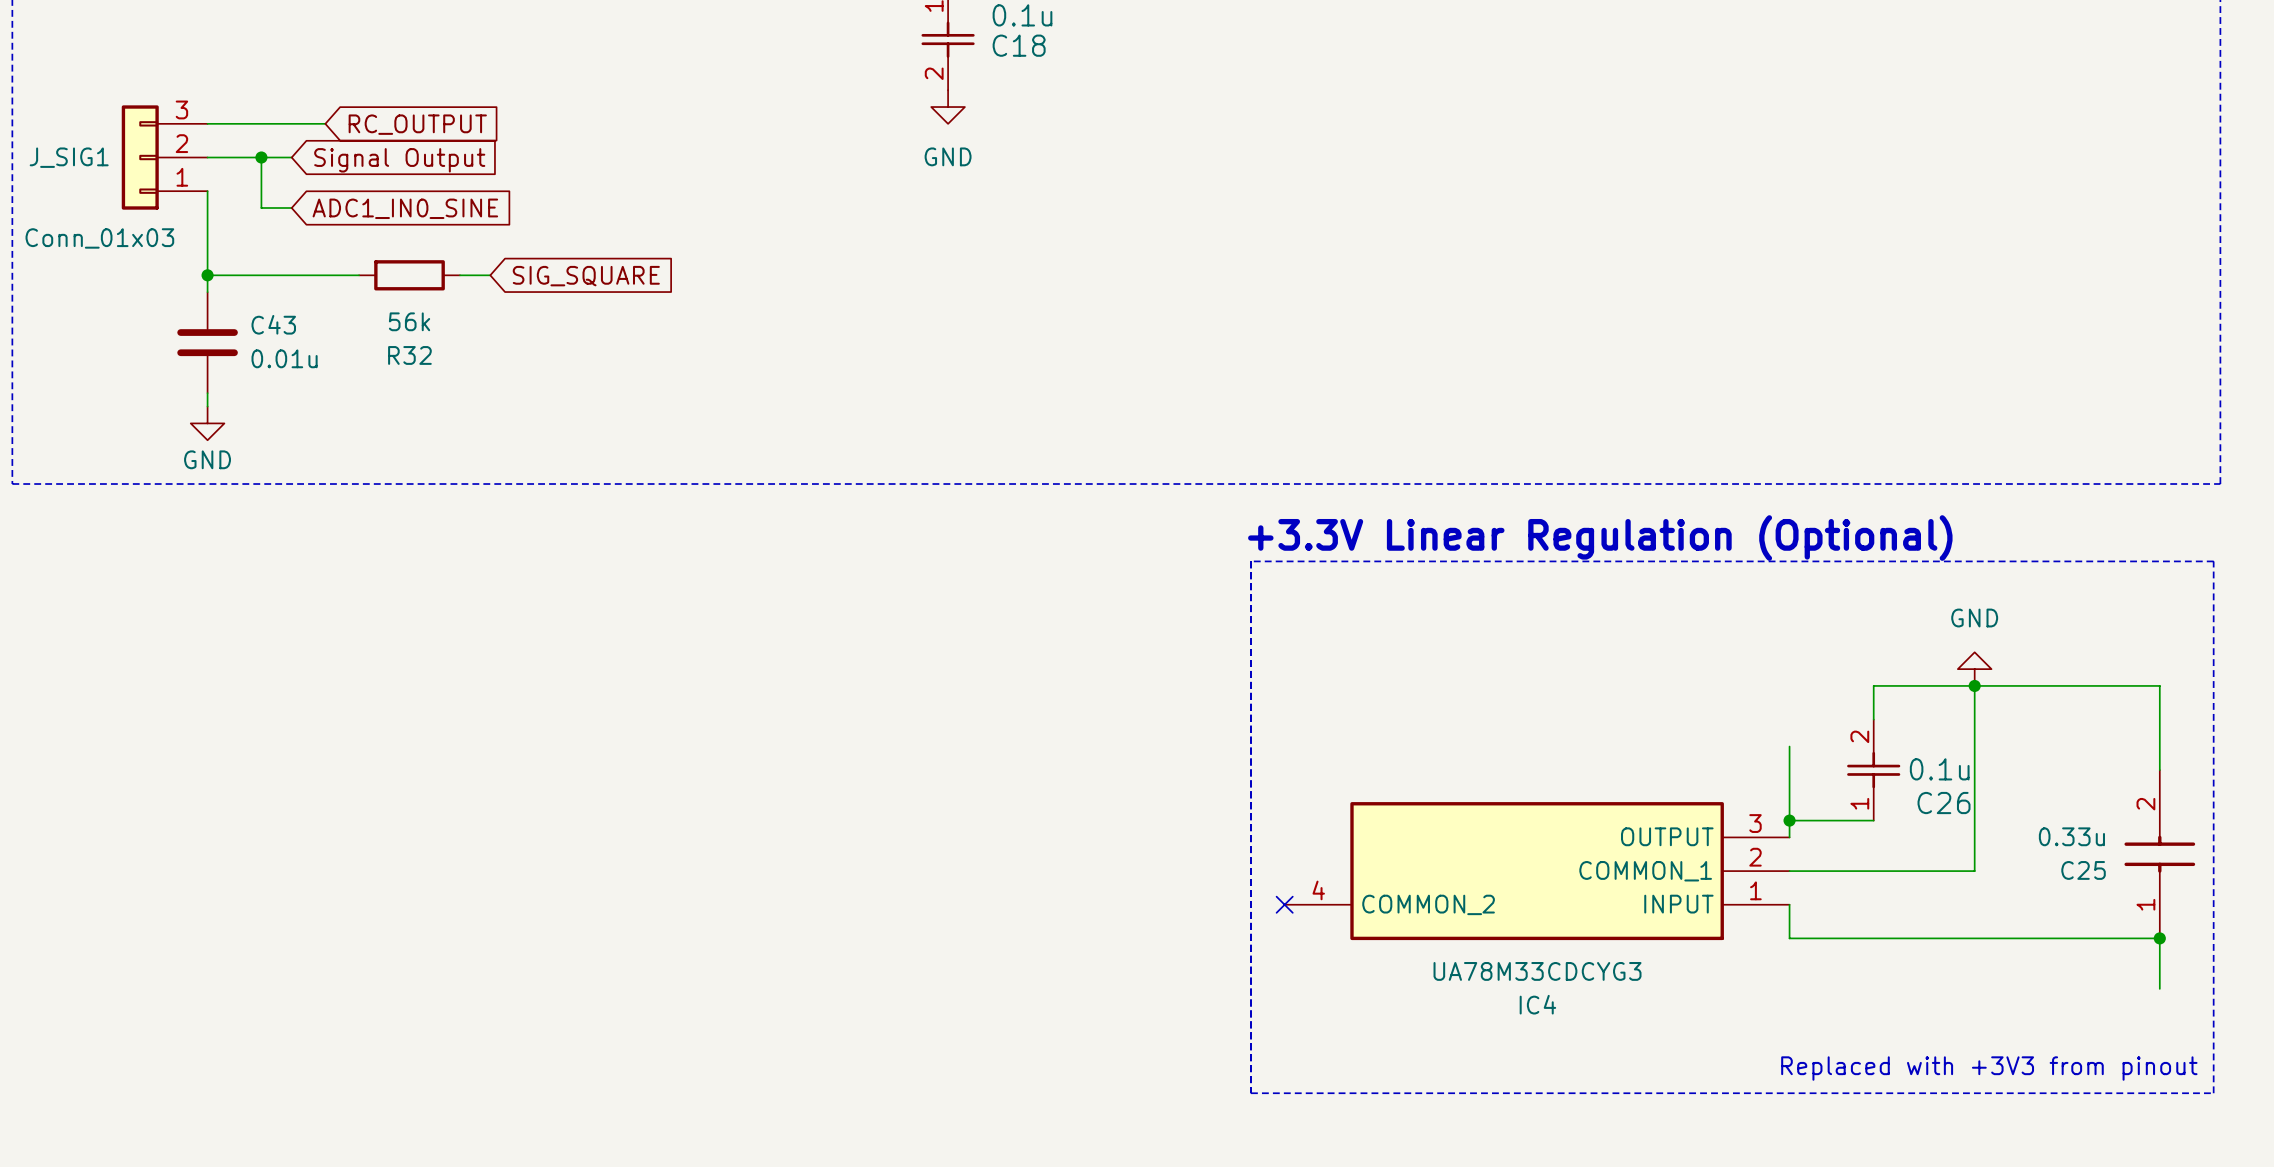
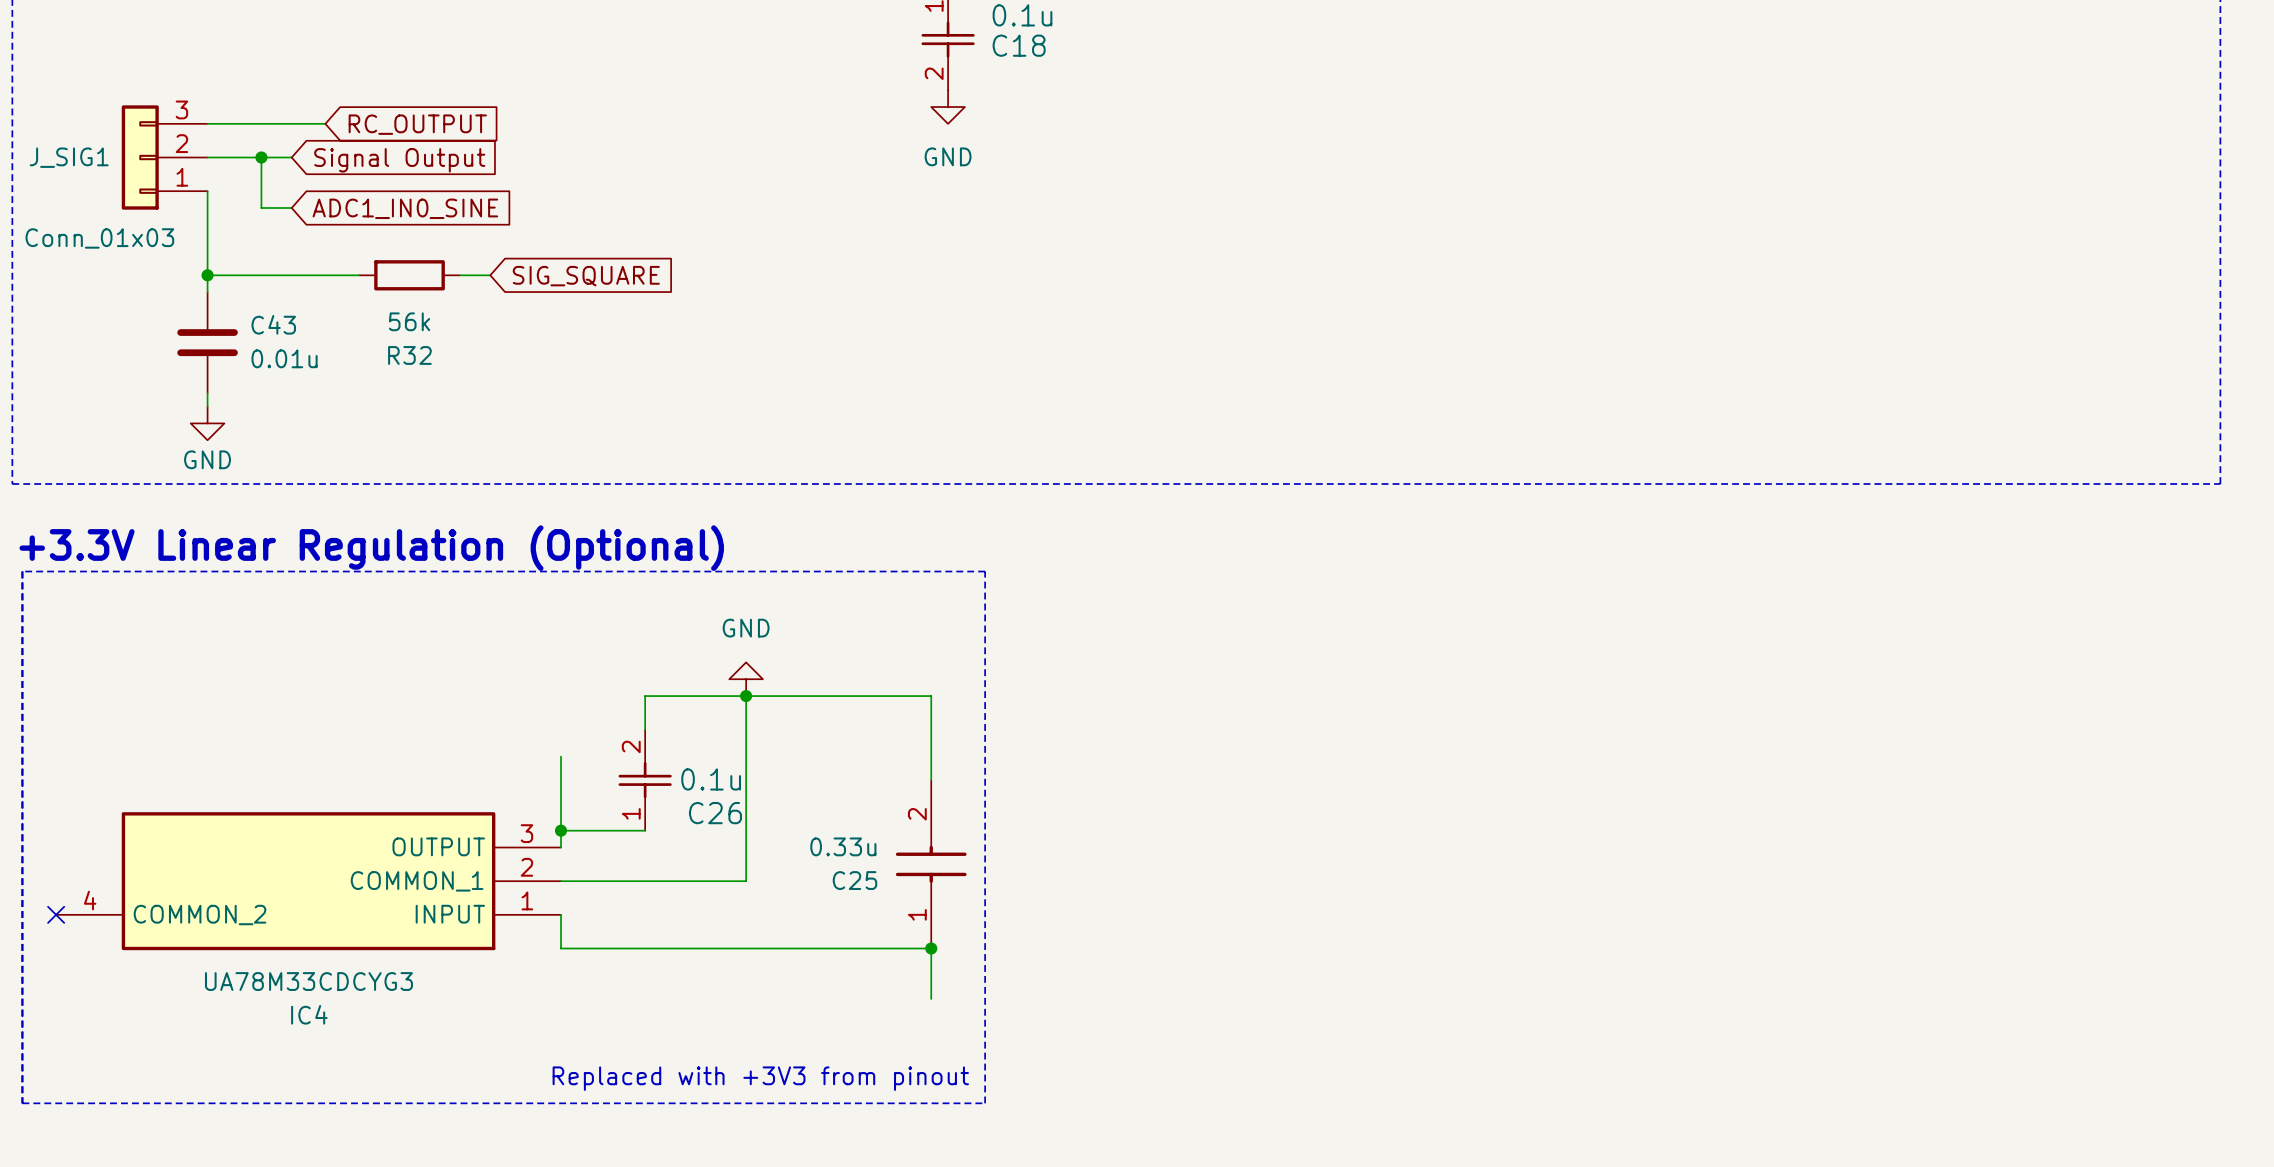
text: +3.3V Linear Regulation (Optional) (1600, 538) -> none
text: none -> +3.3V Linear Regulation (Optional) (371, 548)
line: (1251, 561) (2213, 561) (2213, 1093) (1251, 1093) (1251, 561) -> none
line: none -> (22, 571) (985, 571) (985, 1103) (22, 1103) (22, 571)
power symbol: GND (1974, 669) -> none
power symbol: none -> GND (746, 679)
wire: (1974, 685) (1974, 871) (1789, 871) -> none
junction: (1974, 685) -> none
wire: none -> (746, 696) (746, 881) (561, 881)
junction: none -> (746, 696)
wire: (1873, 719) (1873, 685) (2159, 685) (2159, 770) -> none
wire: none -> (645, 729) (645, 696) (931, 696) (931, 780)
wire: (1789, 746) (1789, 837) -> none
wire: none -> (561, 756) (561, 847)
C26 position: (1873, 770) -> (645, 780)
wire: (1789, 820) (1873, 820) -> none
junction: (1789, 820) -> none
wire: none -> (561, 830) (645, 830)
junction: none -> (561, 830)
C25 position: (2159, 854) -> (931, 864)
IC4 position: (1537, 871) -> (308, 881)
no-connect mark: (1284, 904) -> none
wire: (1789, 904) (1789, 938) (2159, 938) (2159, 988) -> none
no-connect mark: none -> (56, 914)
wire: none -> (561, 914) (561, 948) (931, 948) (931, 998)
junction: (2159, 938) -> none
junction: none -> (931, 948)
text: Replaced with +3V3 from pinout (1989, 1068) -> none
text: none -> Replaced with +3V3 from pinout (760, 1078)

